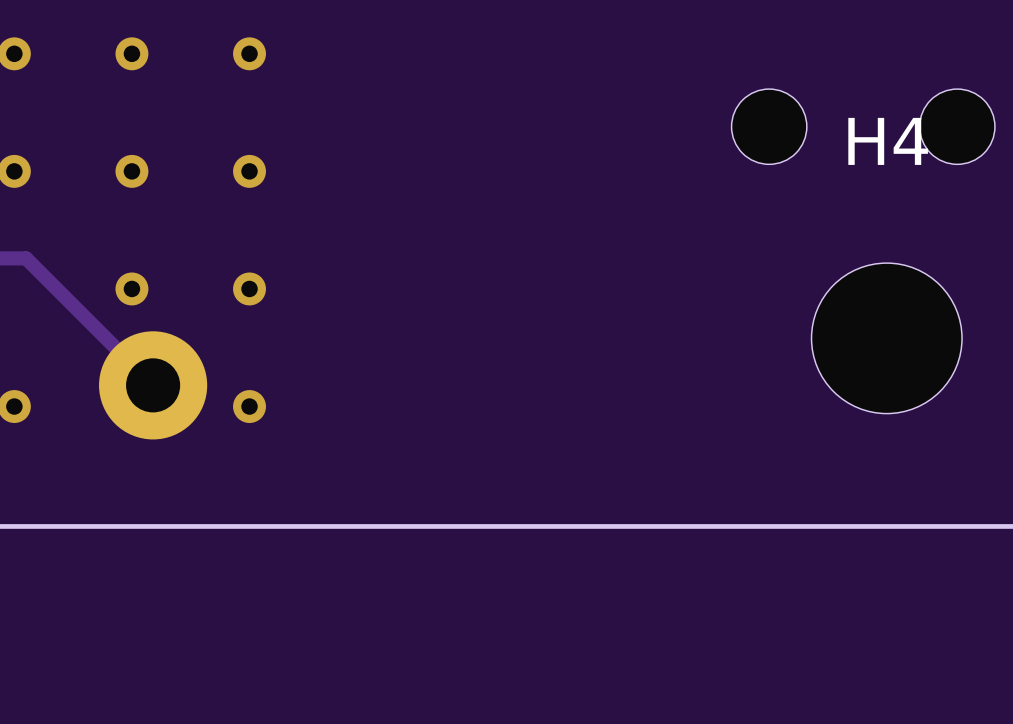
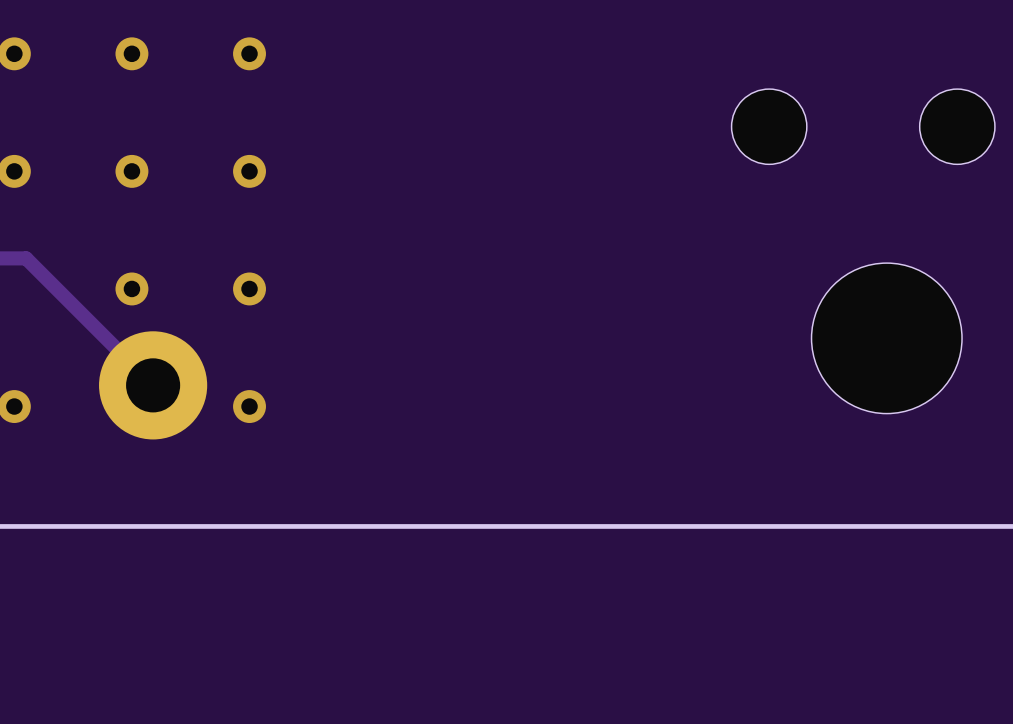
H4 name: H4 (888, 141) -> none

